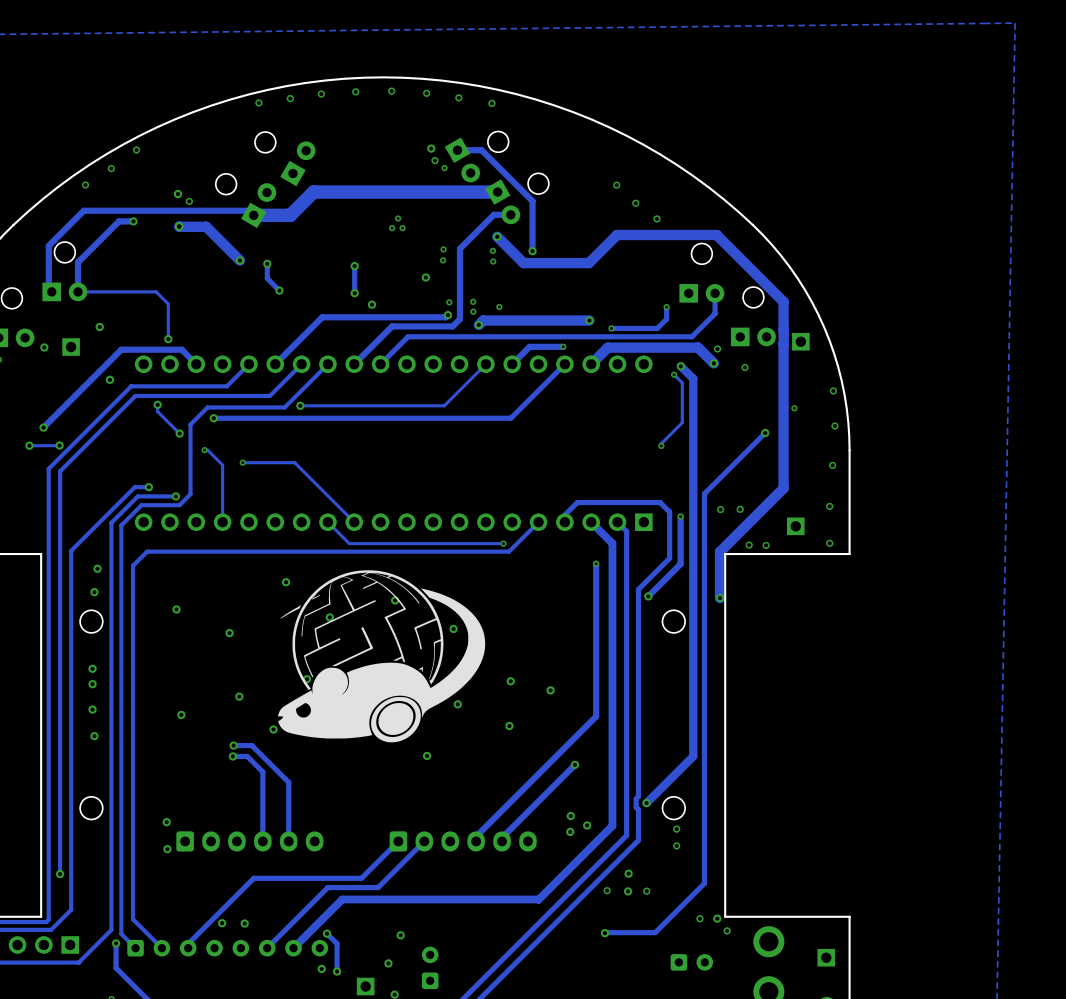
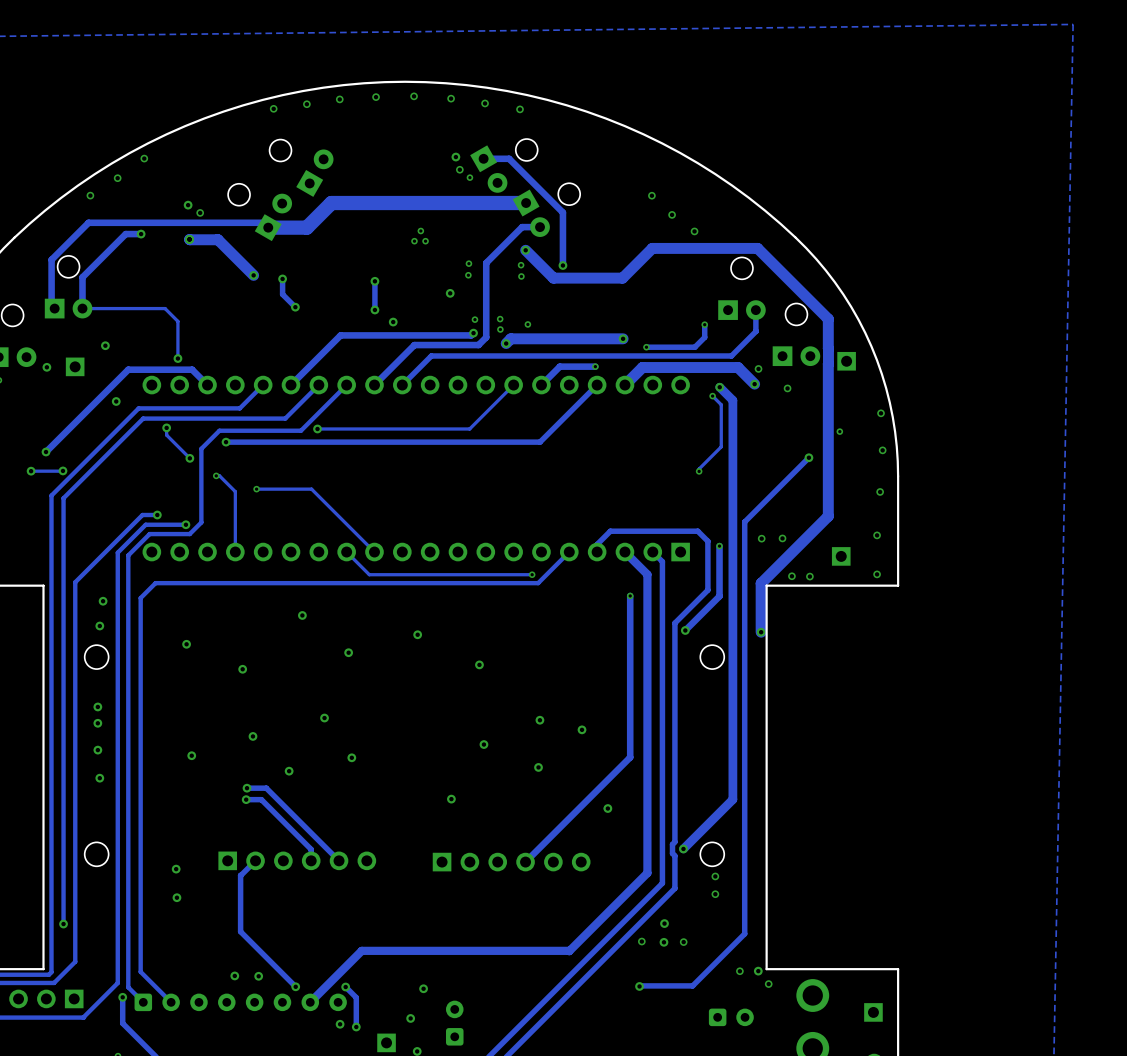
drawing: [278, 570, 486, 743] -> none
track: (575, 764) (500, 839) (502, 841) -> none
track: (262, 771) (262, 841) -> (277, 816) (311, 849) (311, 860)
track: (288, 782) (288, 841) -> (305, 827) (339, 860)
track: none -> (255, 860) (240, 875) (240, 931) (295, 986)
part: none -> (297, 860)
part: none -> (511, 862)
track: (497, 815) (476, 836) (476, 841) -> none
via: (570, 816) -> none
via: (587, 825) -> none
via: (570, 831) -> none
part: (249, 841) -> none
track: (398, 841) (361, 878) (253, 878) (188, 943) (188, 948) -> none
track: (424, 841) (378, 887) (327, 887) (267, 948) -> none
part: (463, 841) -> none
via: none -> (295, 986)

